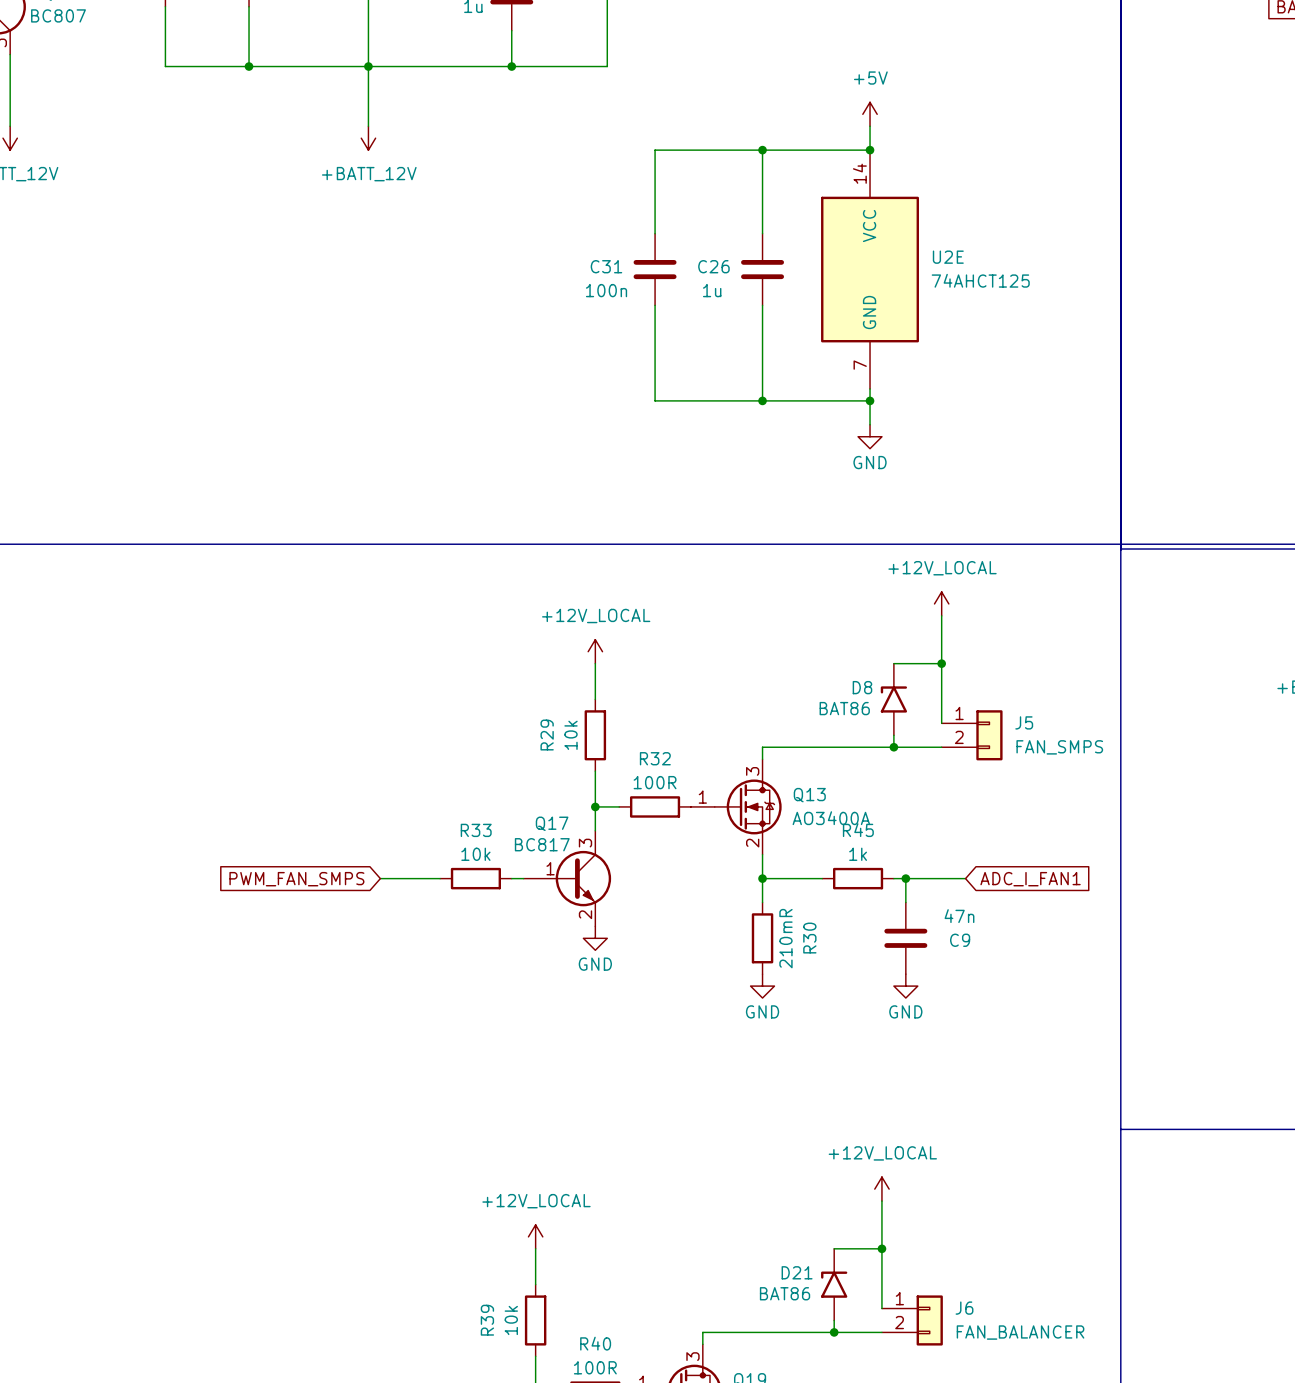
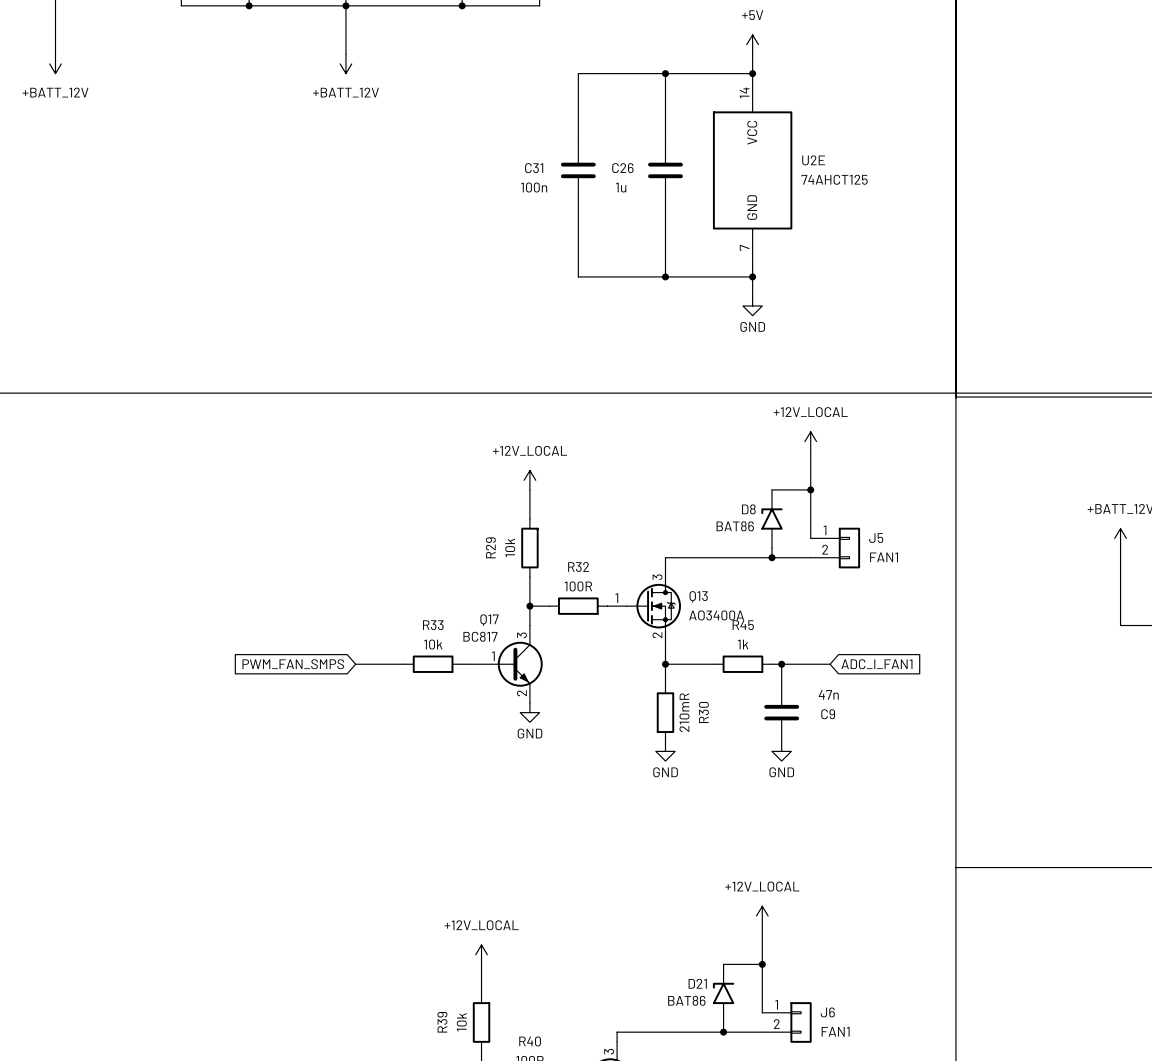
J5 value: FAN_SMPS (1059, 747) -> FAN1 (884, 557)
J6 value: FAN_BALANCER (1020, 1332) -> FAN1 (835, 1031)

